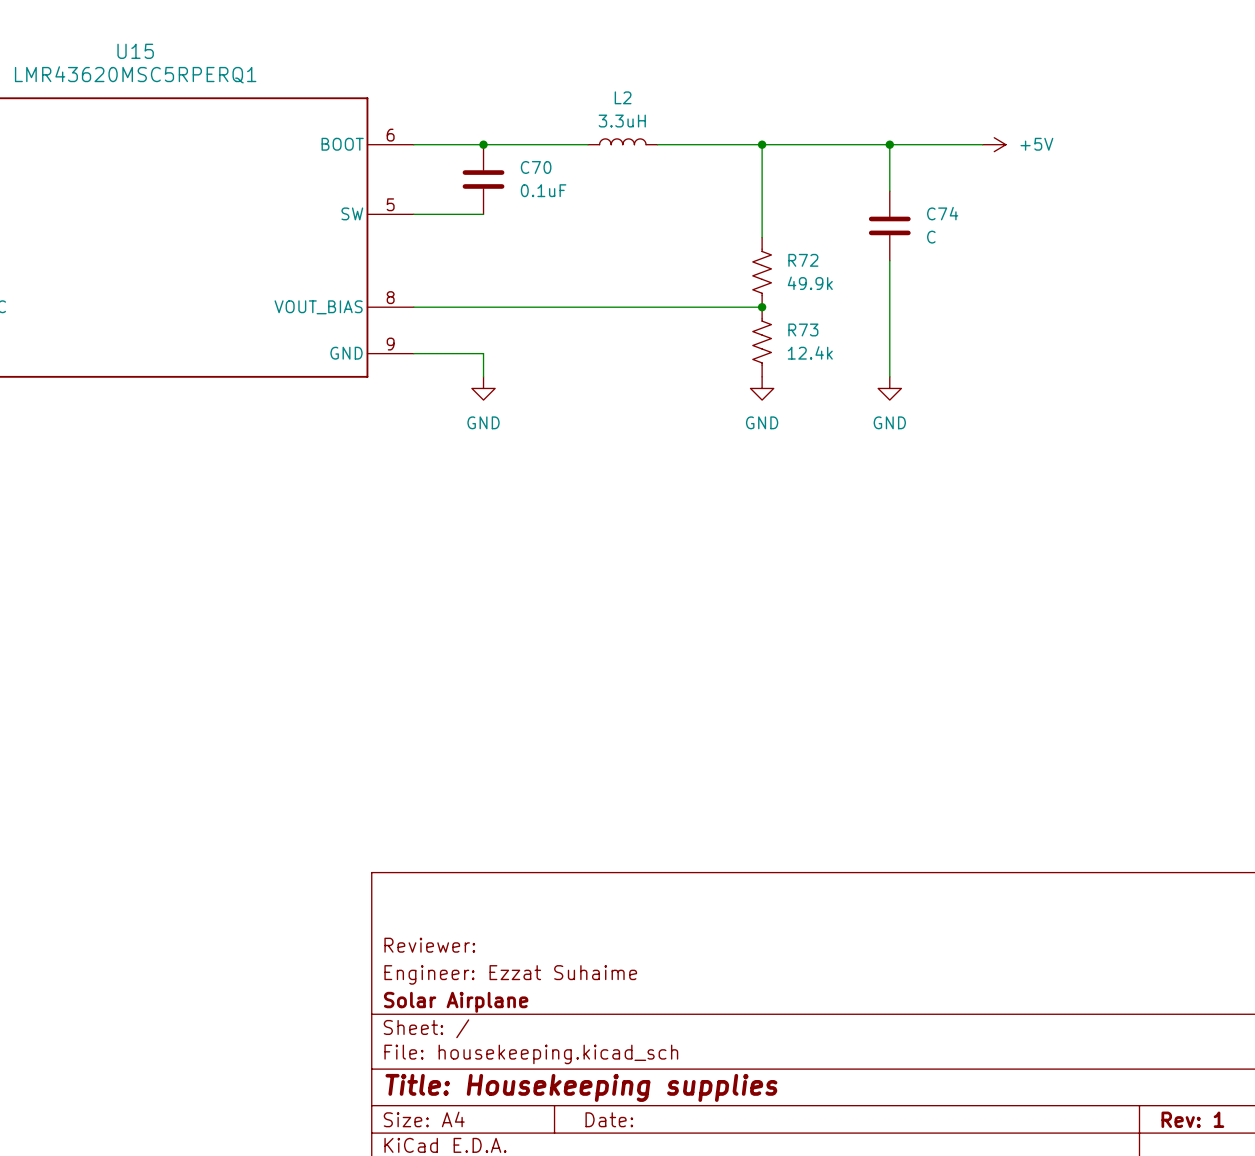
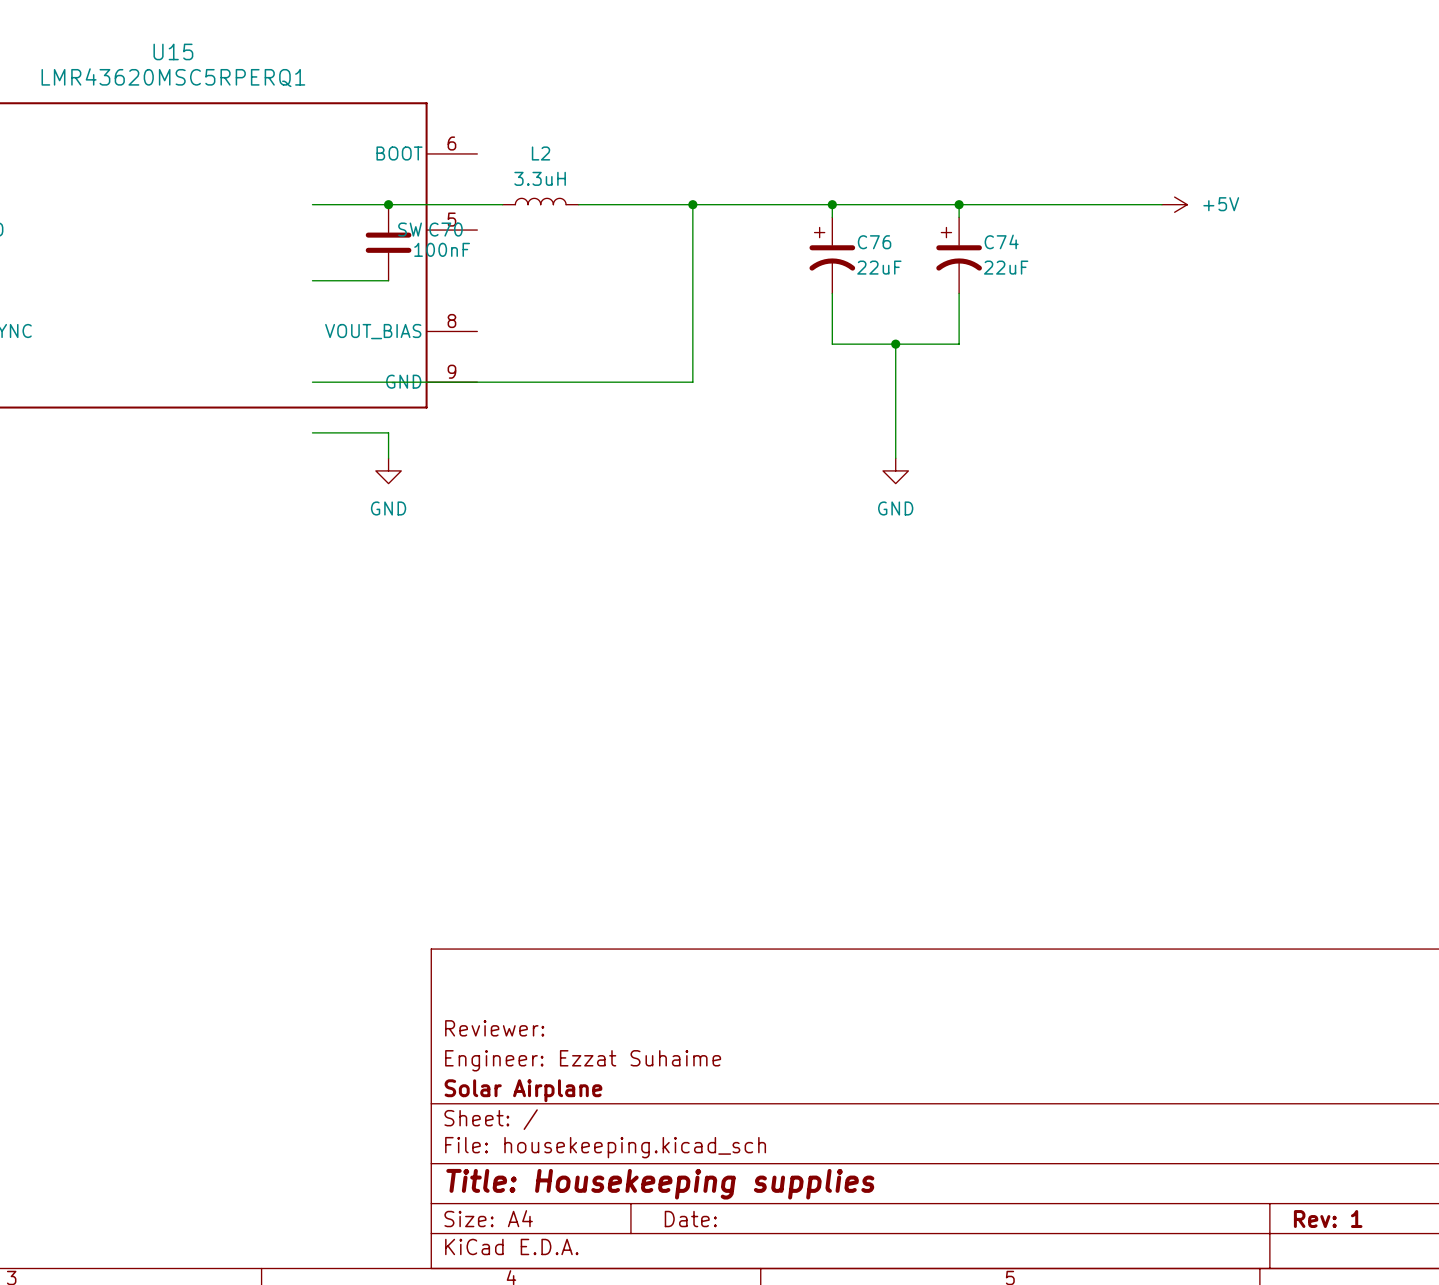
L2 position: (622, 141) -> (540, 201)
wire: (413, 144) (587, 144) -> (312, 204) (502, 204)
junction: (483, 144) -> none
wire: (657, 144) (982, 144) -> none
wire: (762, 144) (762, 237) -> none
junction: (762, 144) -> none
wire: (889, 144) (889, 191) -> none
junction: (889, 144) -> none
power symbol position: +5V (994, 144) -> +5V (1174, 204)
C70 position: (483, 179) -> (388, 242)
C70 value: 0.1uF (543, 190) -> 100nF (442, 249)
junction: none -> (388, 204)
wire: none -> (578, 204) (1161, 204)
junction: none -> (692, 204)
wire: none -> (832, 204) (832, 217)
junction: none -> (832, 204)
wire: none -> (959, 204) (959, 217)
junction: none -> (959, 204)
C74 symbol: [868, 191, 911, 261] -> [936, 217, 982, 294]
wire: (413, 214) (483, 214) -> (312, 280) (388, 280)
C76: none -> 22uF (832, 255)
C74 value: C (931, 237) -> 22uF (1006, 267)
wire: (889, 260) (889, 376) -> none
wire: none -> (832, 293) (832, 344) (959, 344) (959, 293)
R72: 49.9k (762, 272) -> none
wire: (413, 307) (762, 307) -> none
junction position: (762, 307) -> (895, 344)
wire: none -> (895, 344) (895, 458)
R73: 12.4k (762, 342) -> none
wire: none -> (312, 382) (477, 382)
wire: (483, 353) (483, 376) -> (553, 382) (692, 382) (692, 204)
power symbol position: GND (483, 388) -> GND (388, 470)
power symbol: GND (762, 388) -> none
power symbol: GND (889, 388) -> none
wire: none -> (312, 432) (388, 432) (388, 458)
power symbol: none -> GND (895, 470)

